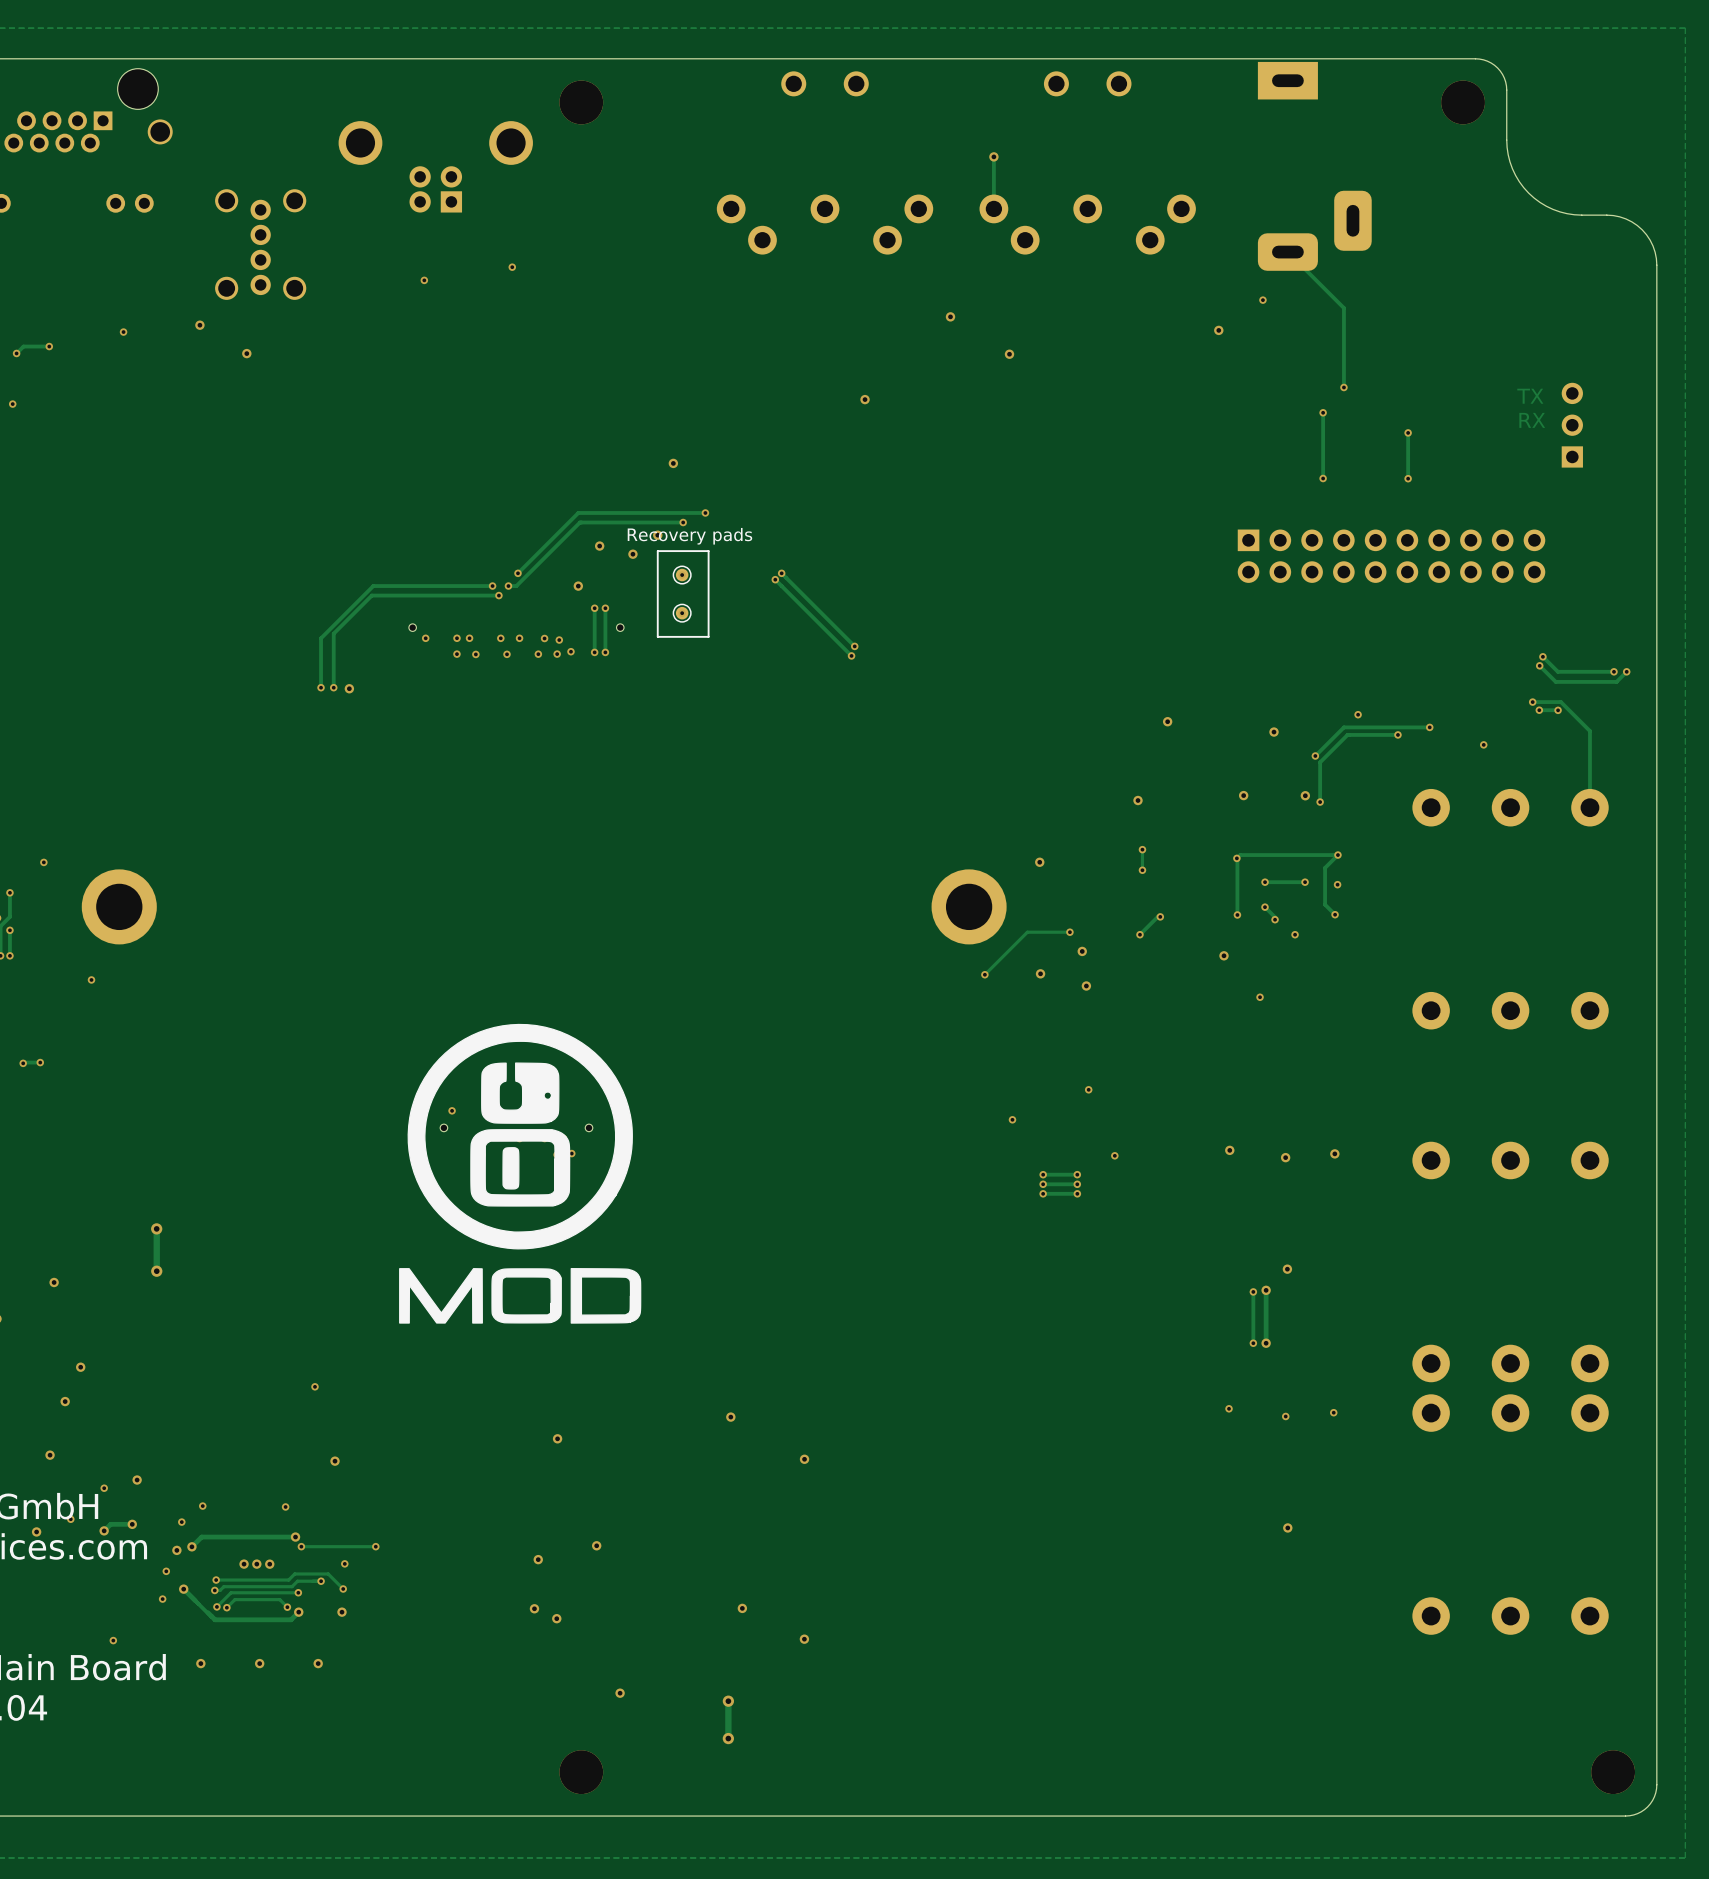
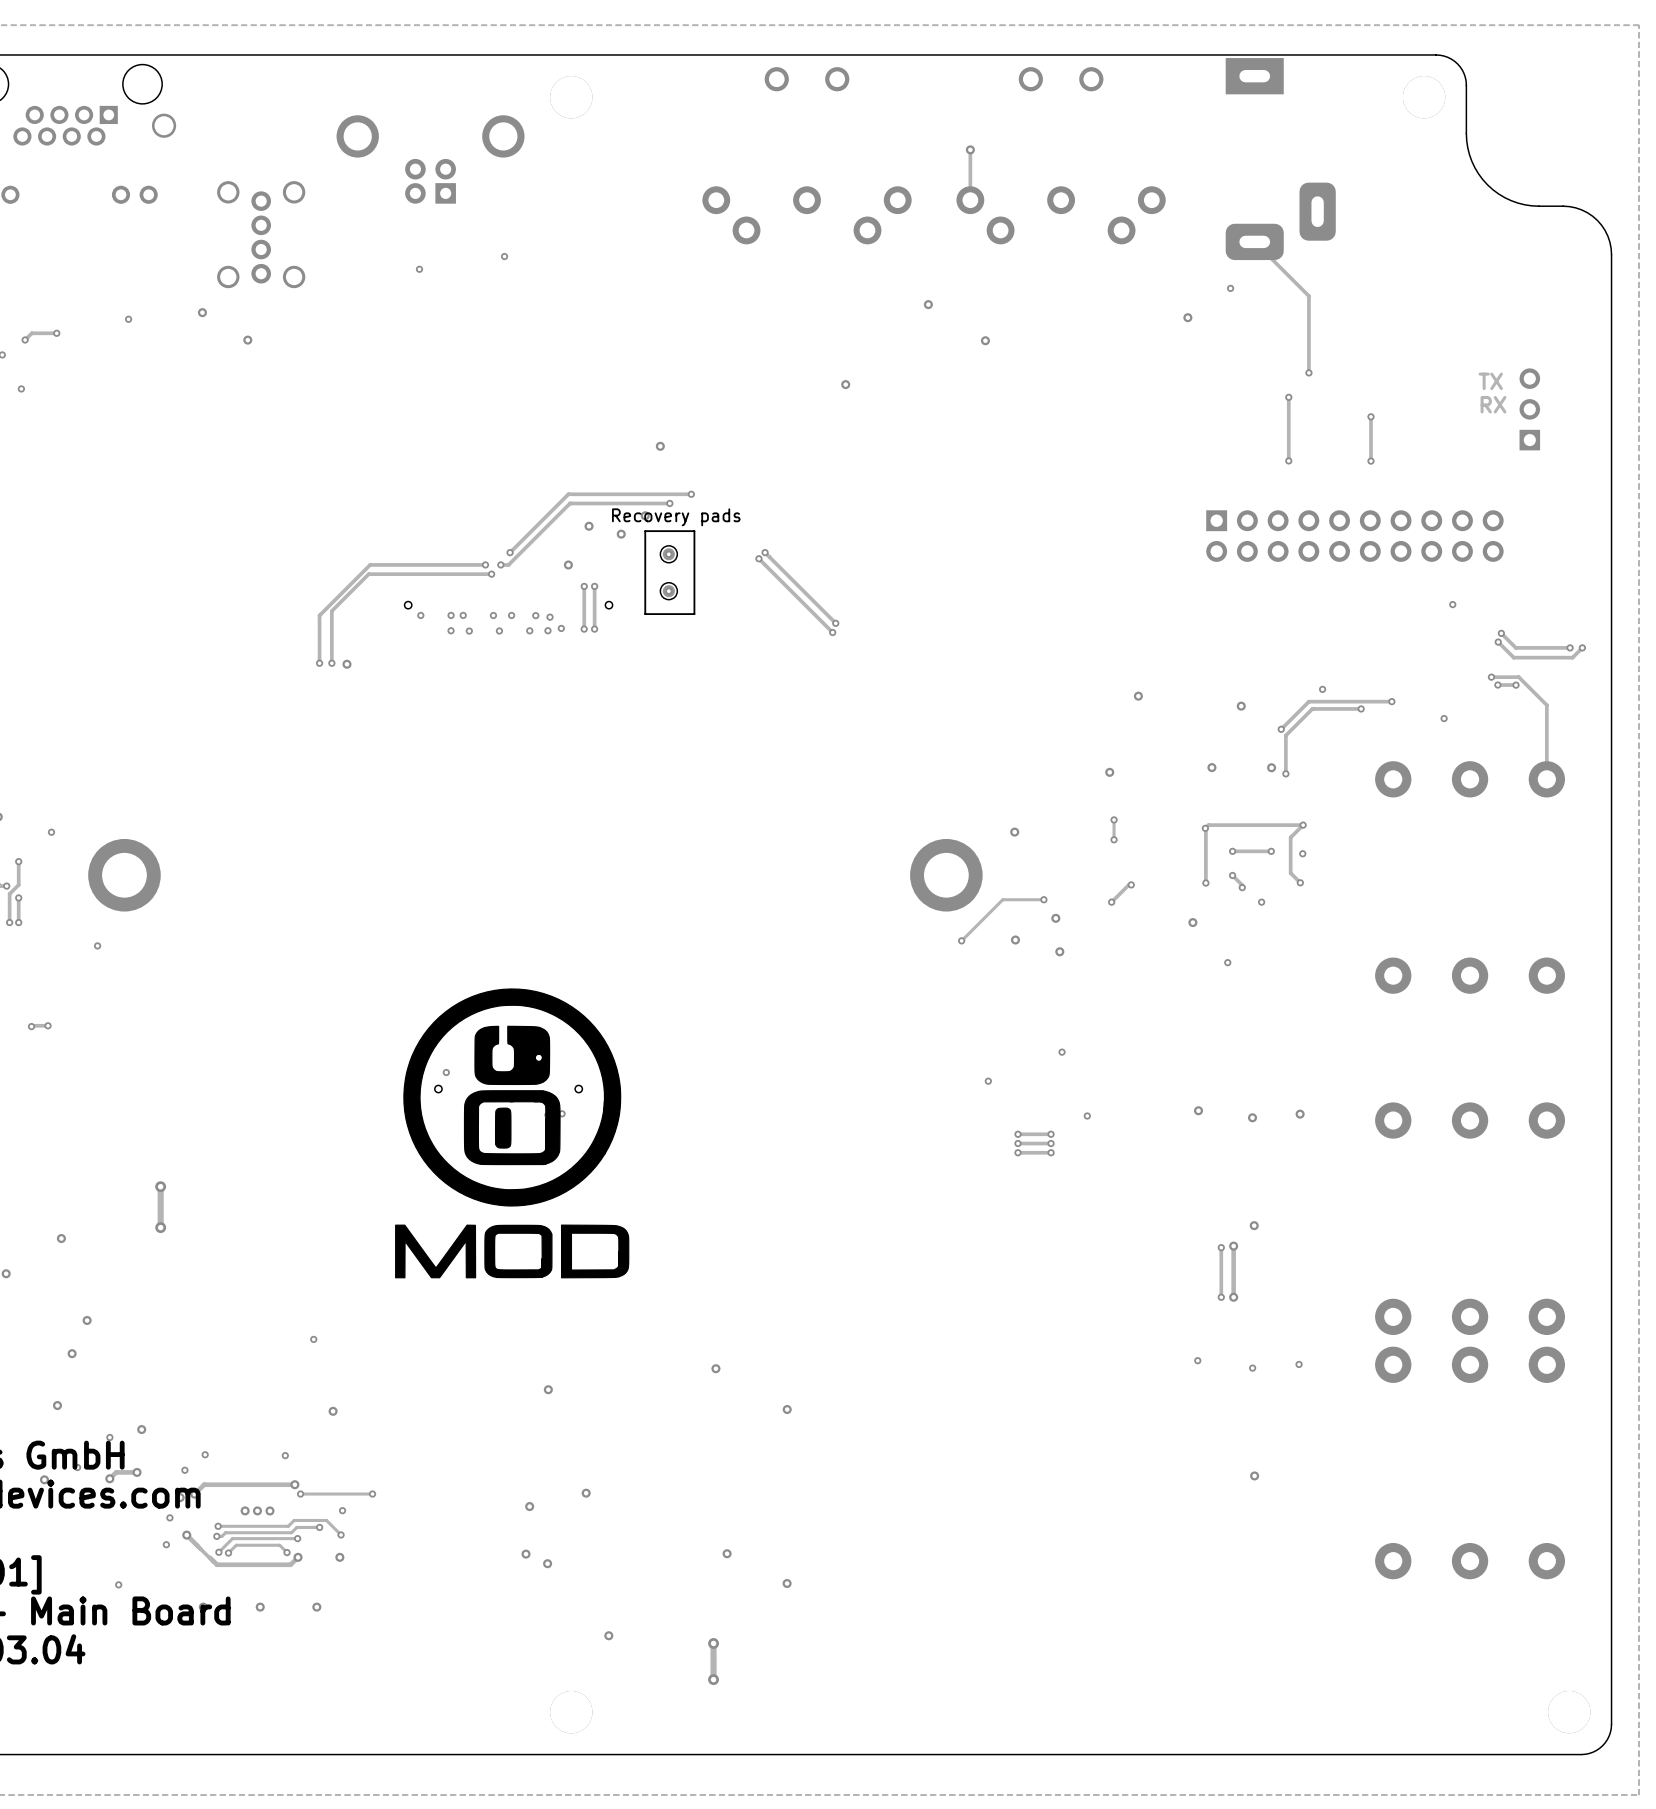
via: none -> (1452, 604)

